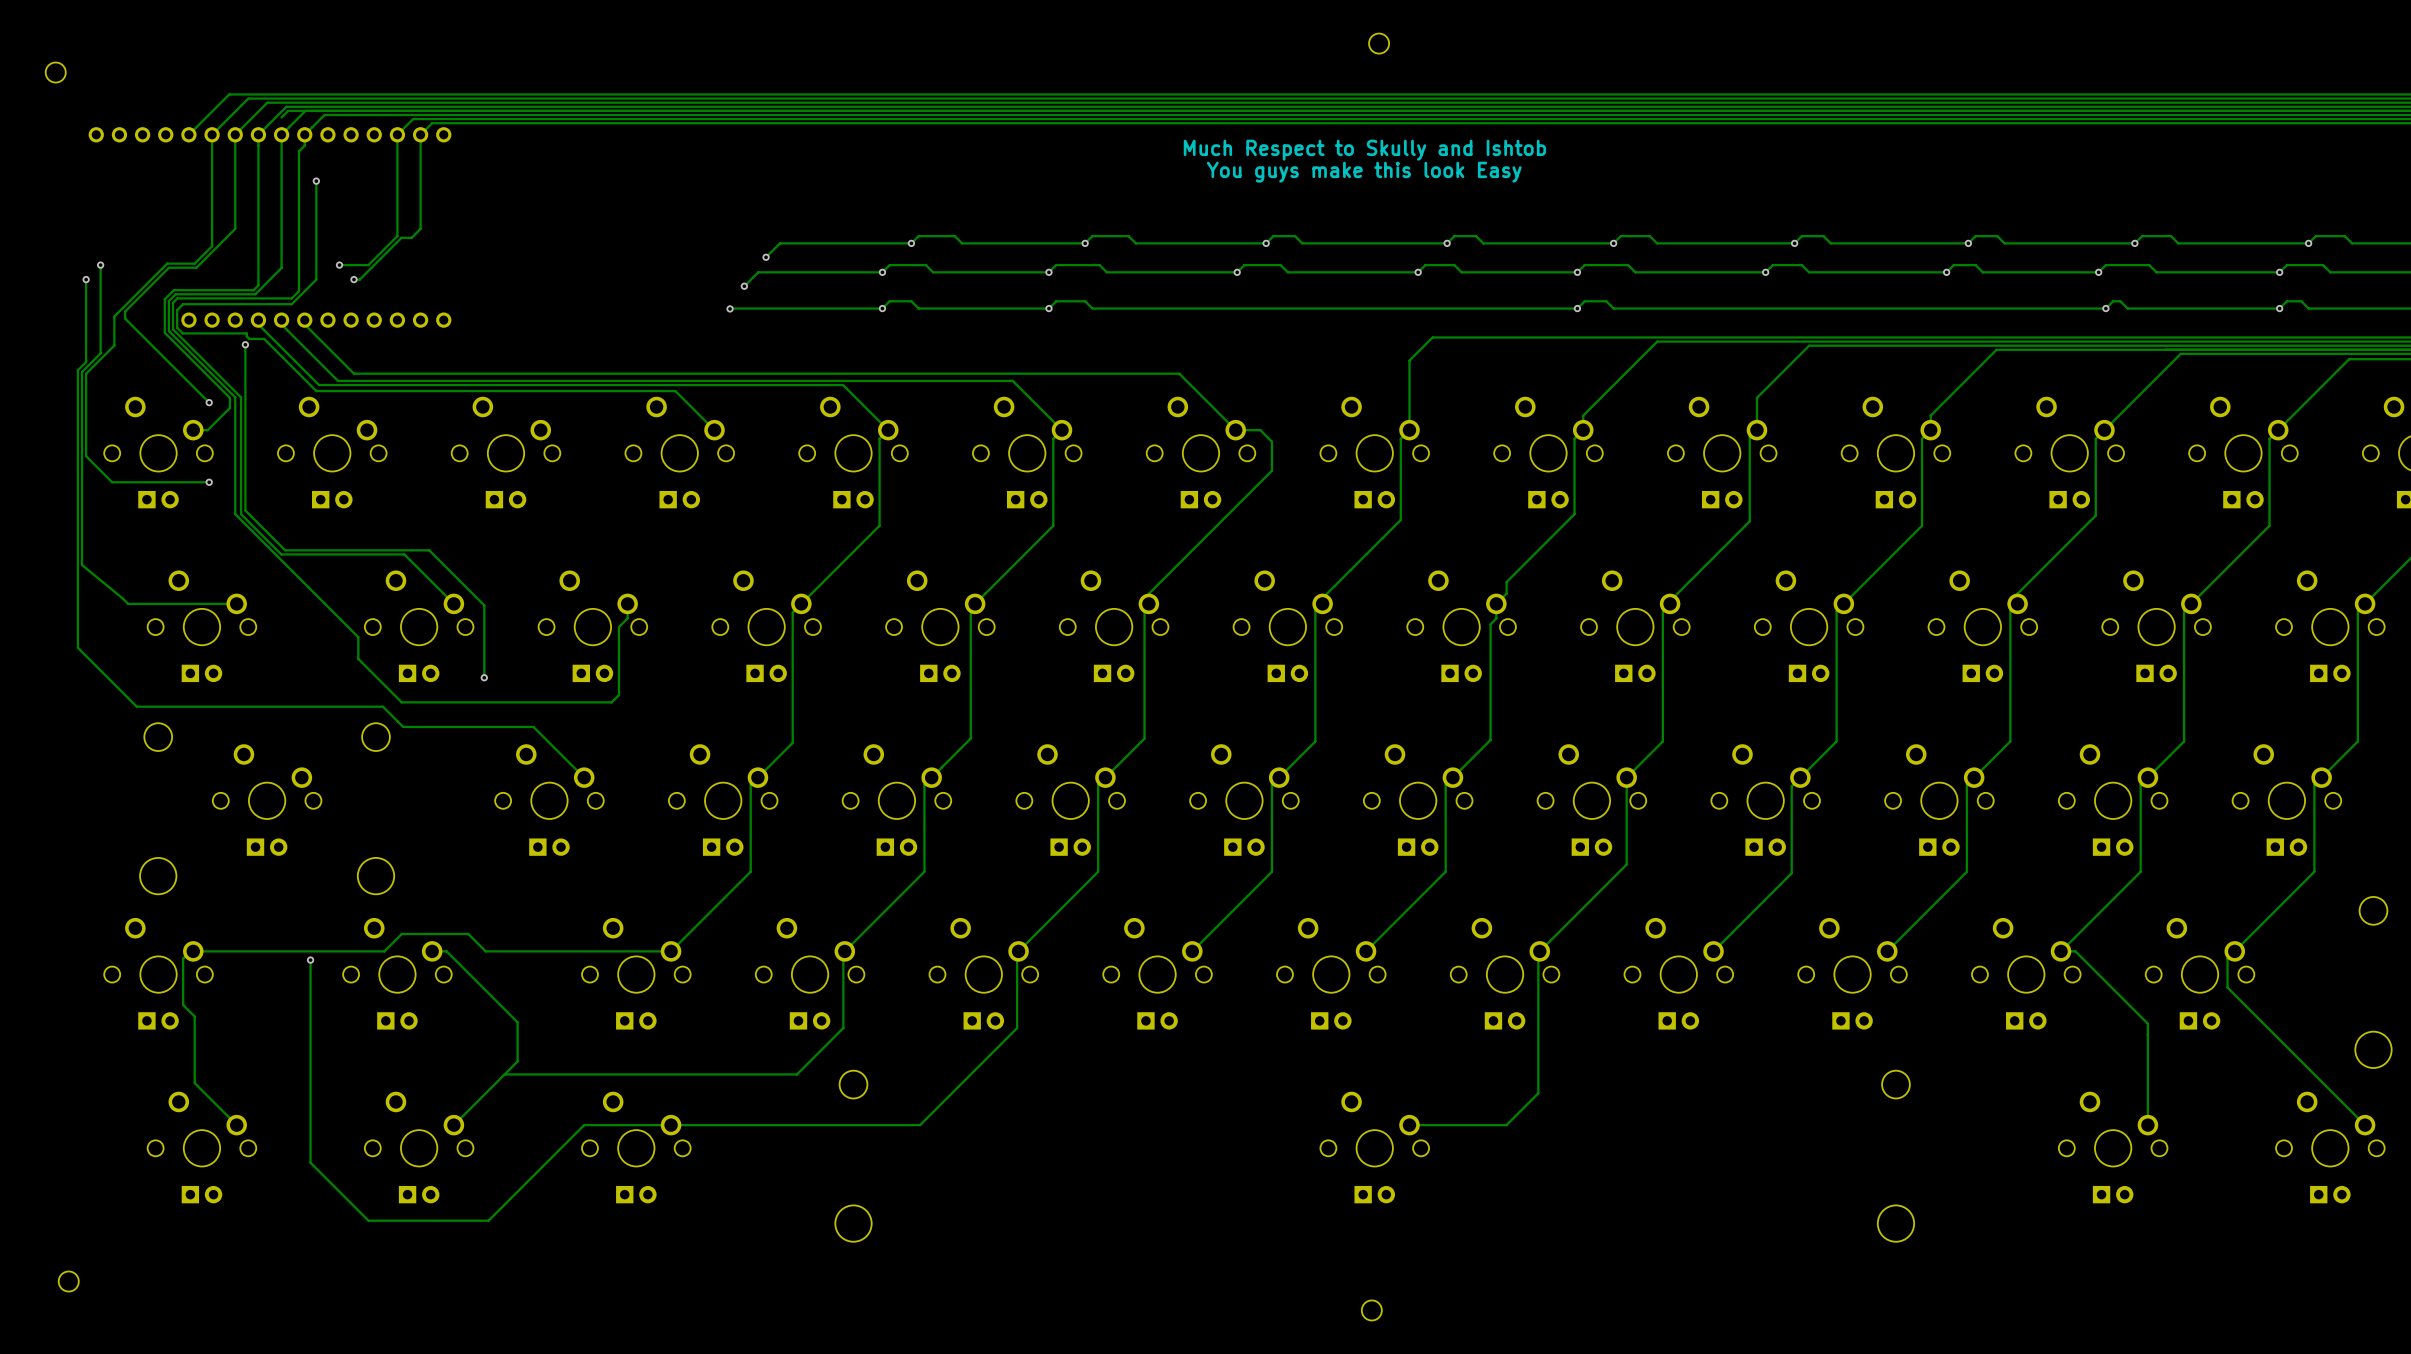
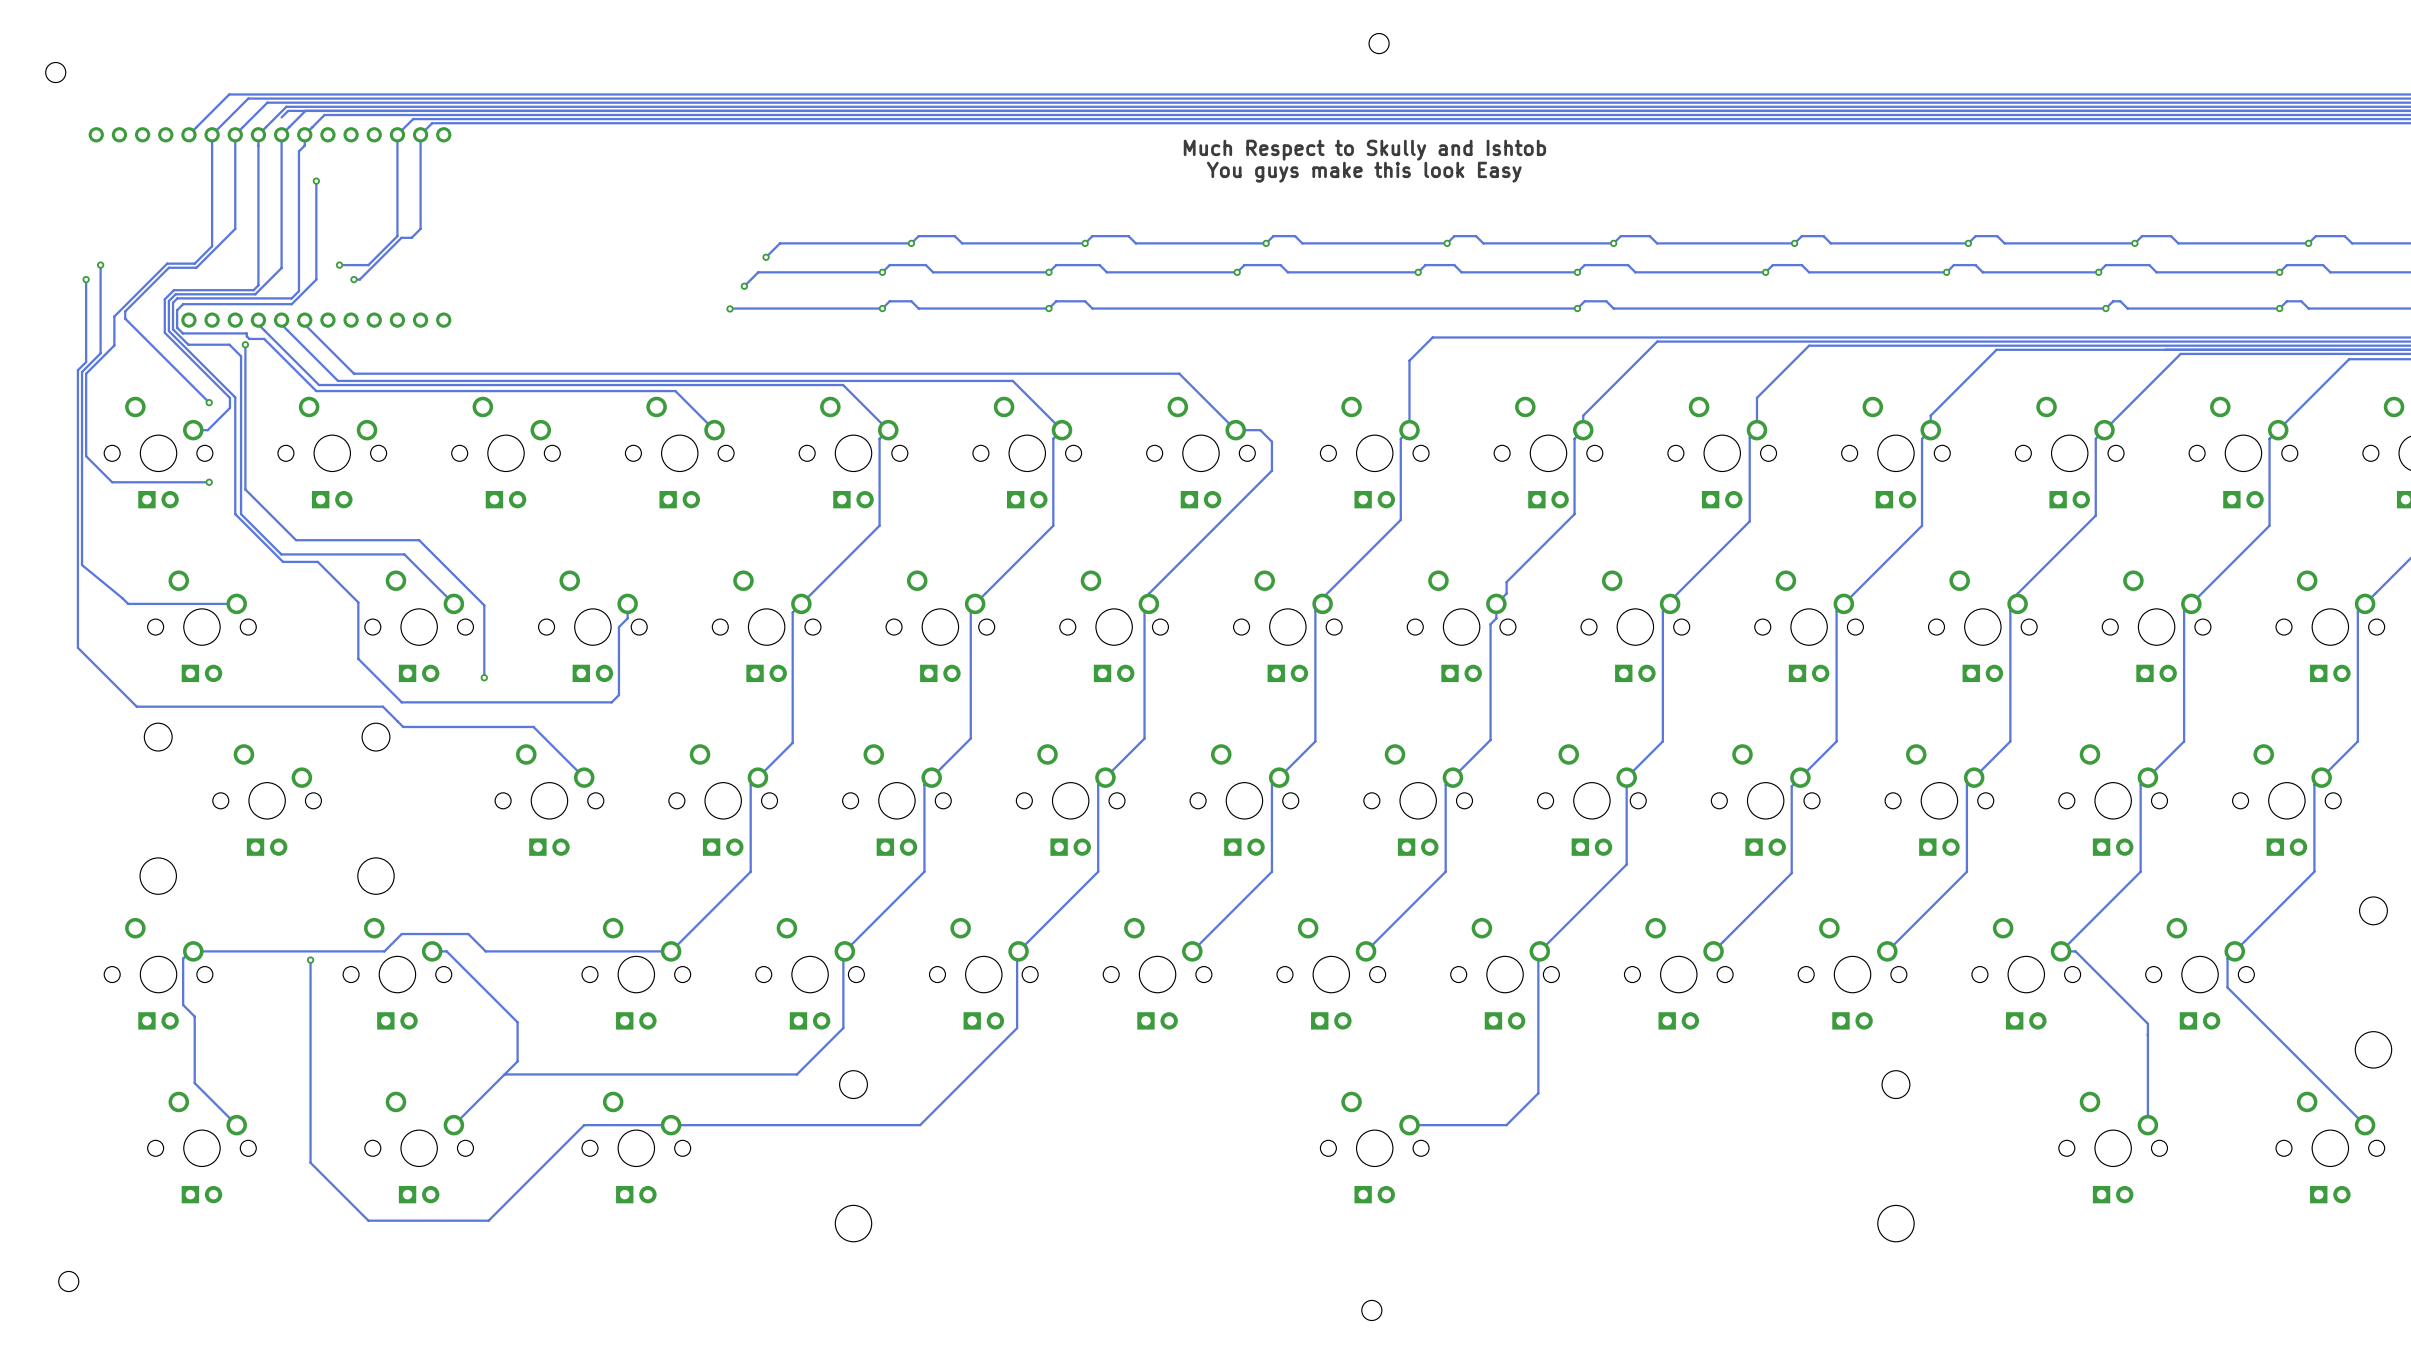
track: (188, 344) (241, 397) -> (188, 344) (229, 344) (241, 356) (241, 397)
track: (245, 489) (245, 510) (285, 550) (429, 550) -> (245, 489) (296, 540) (419, 540) (429, 550)
track: (283, 561) (358, 637) -> (283, 561) (317, 561) (358, 602) (358, 637)

